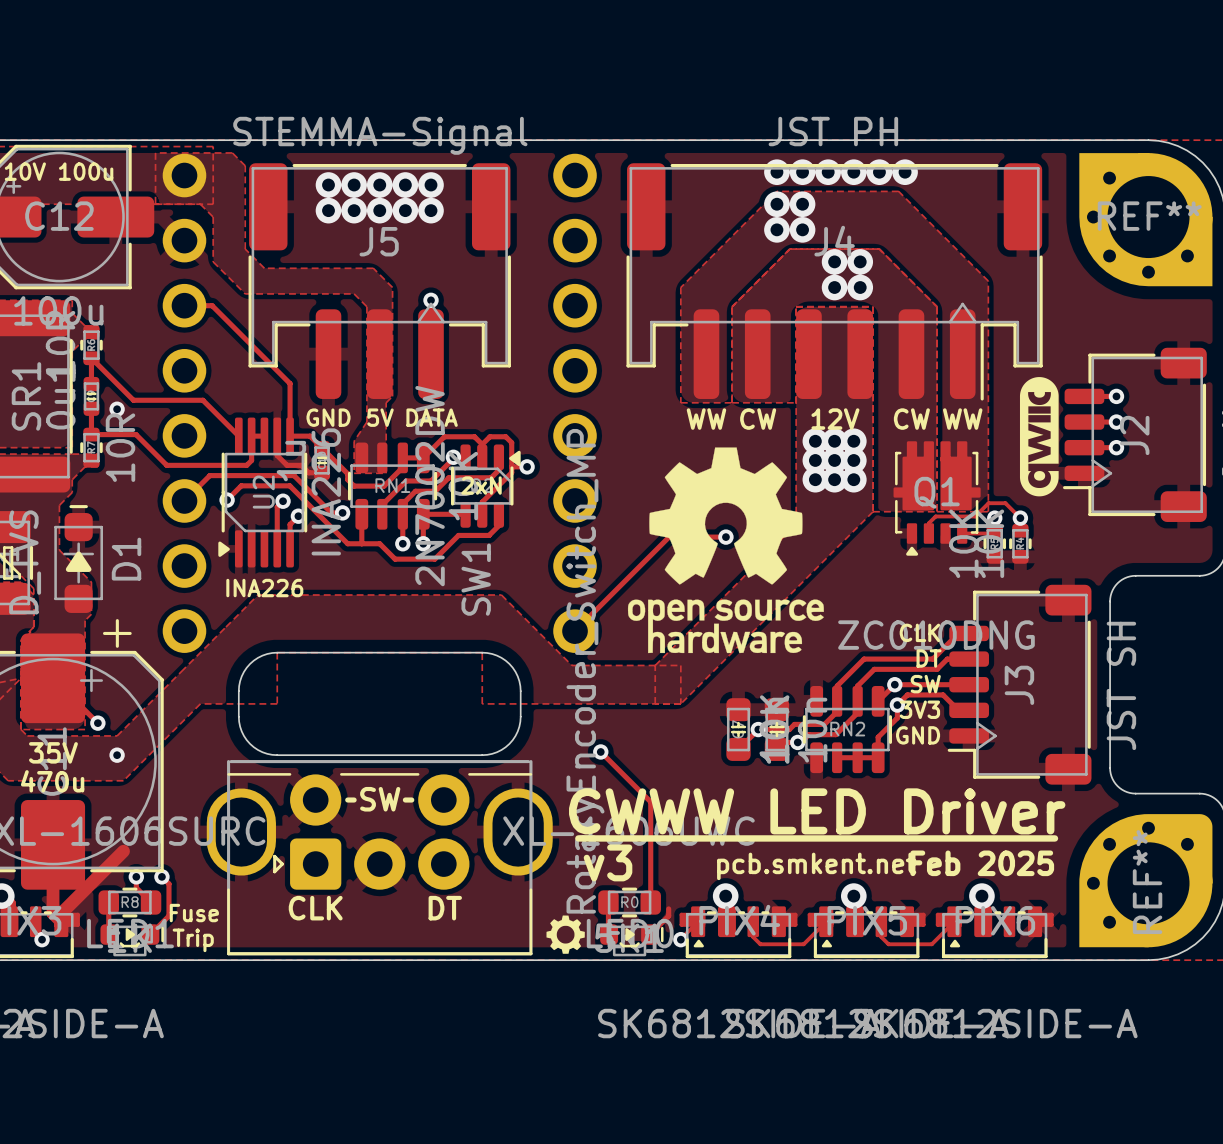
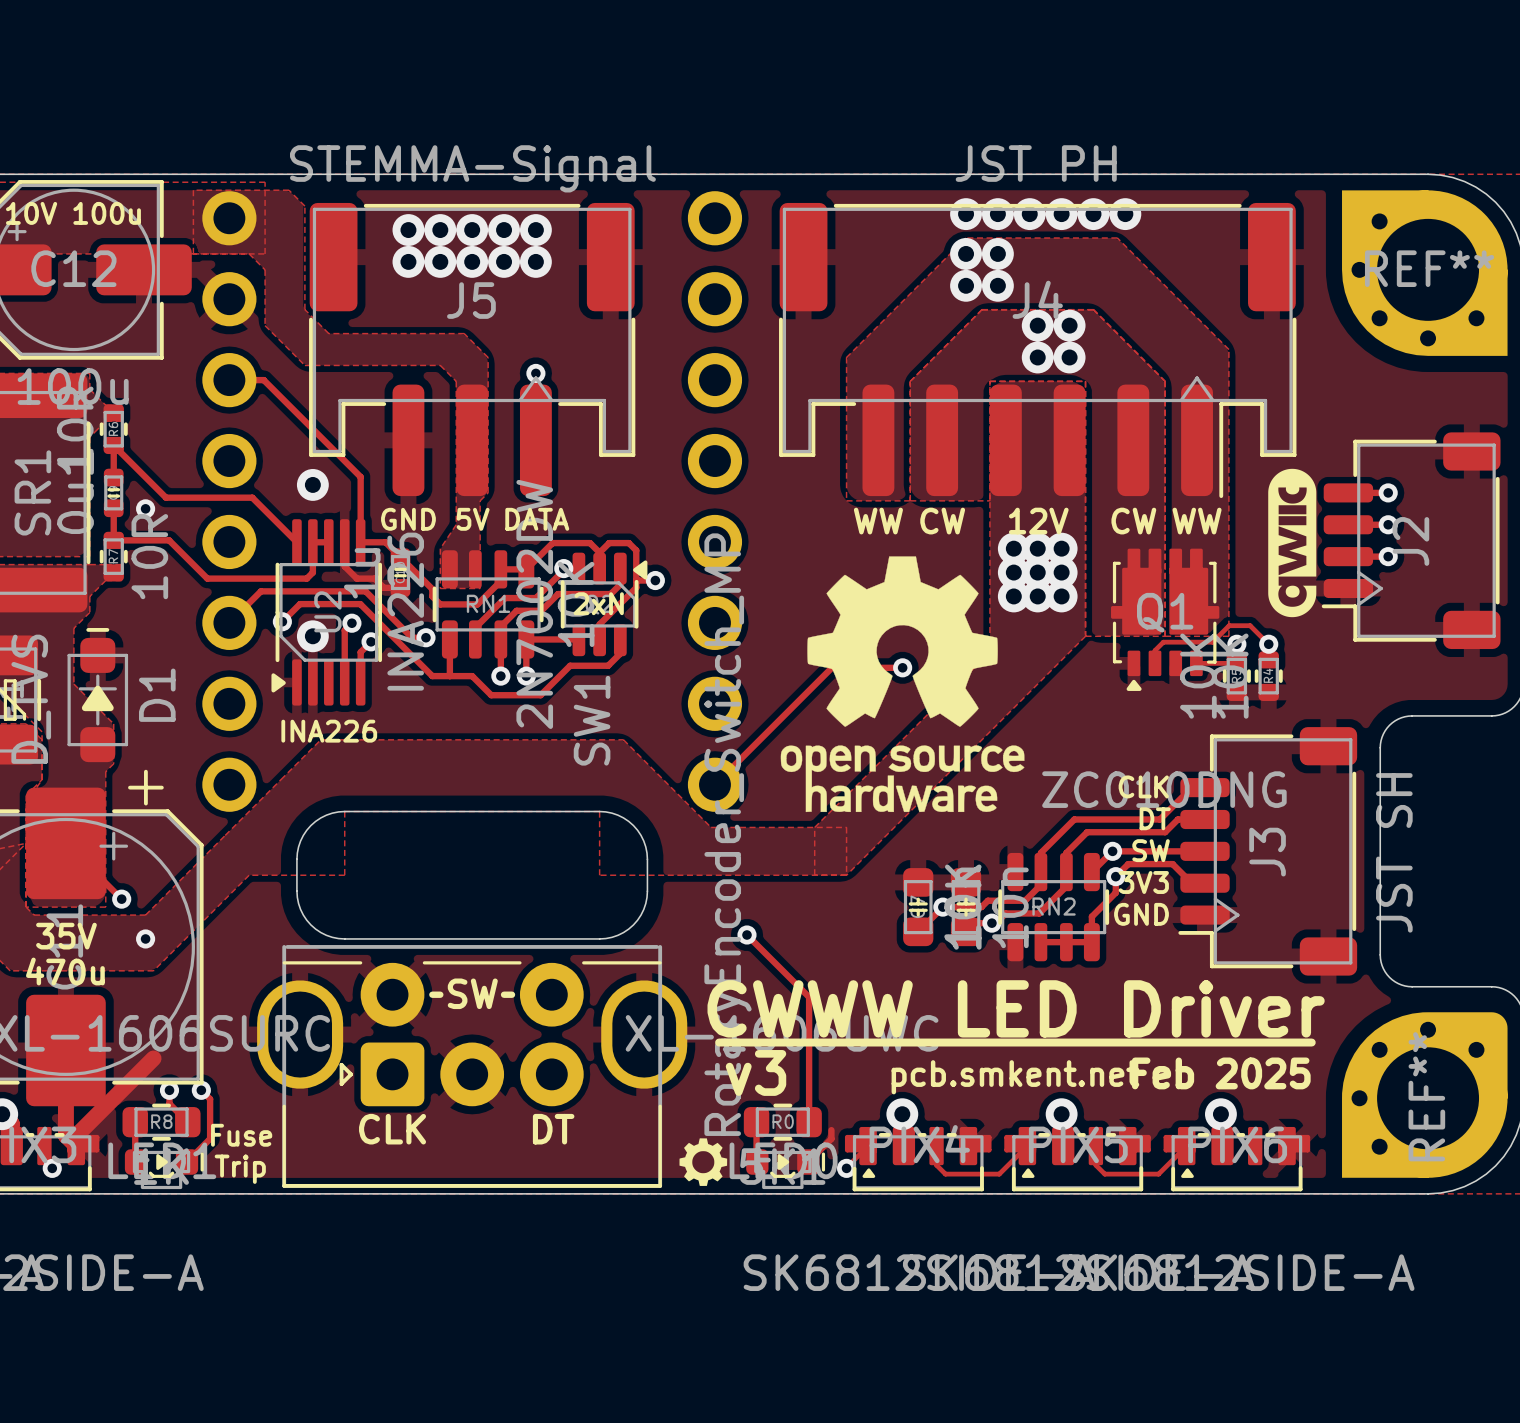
via: none -> (312, 484)
via: none -> (312, 636)

